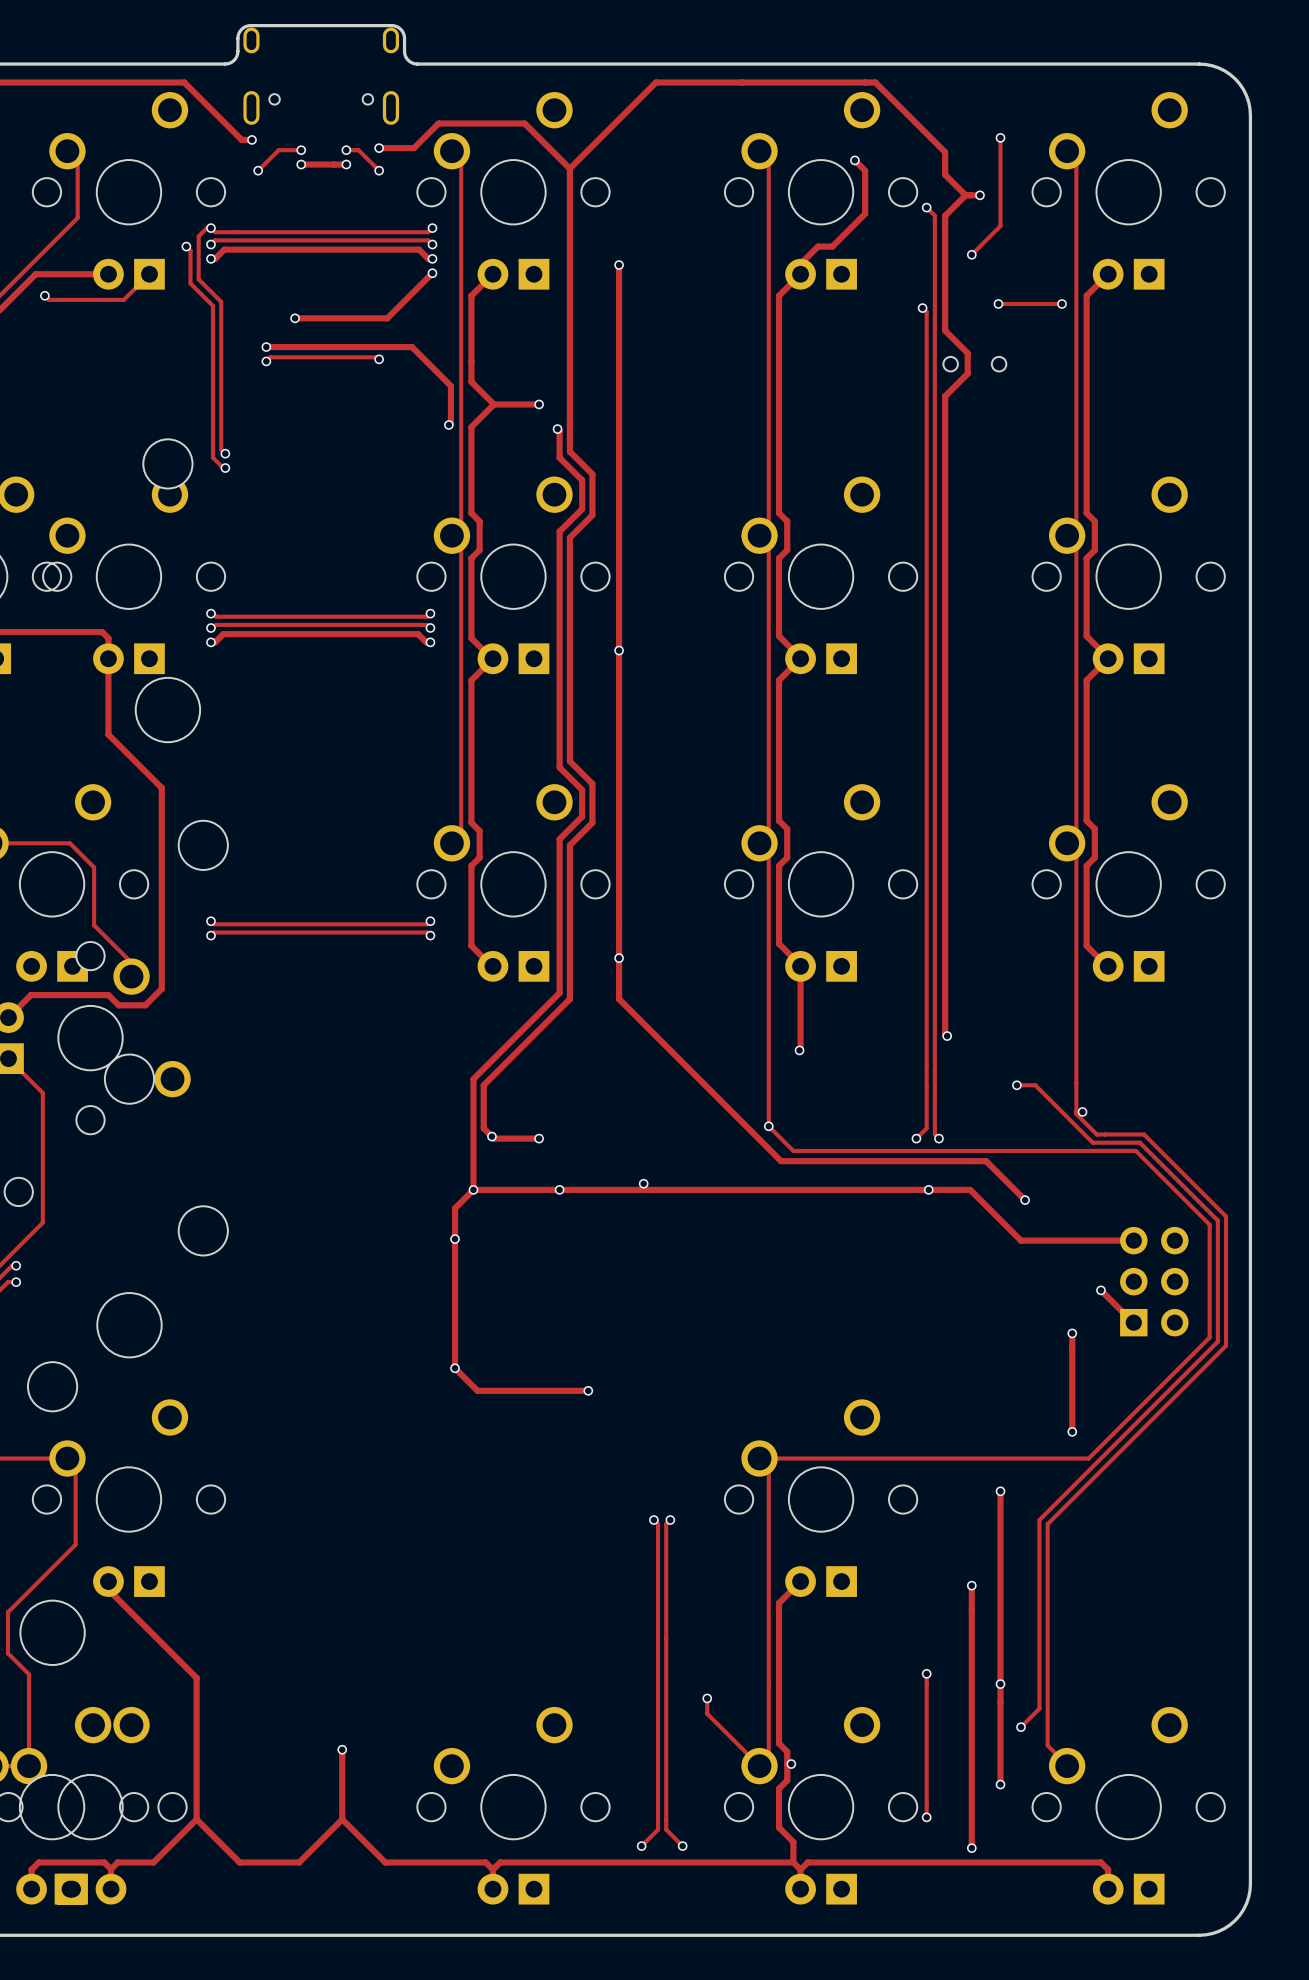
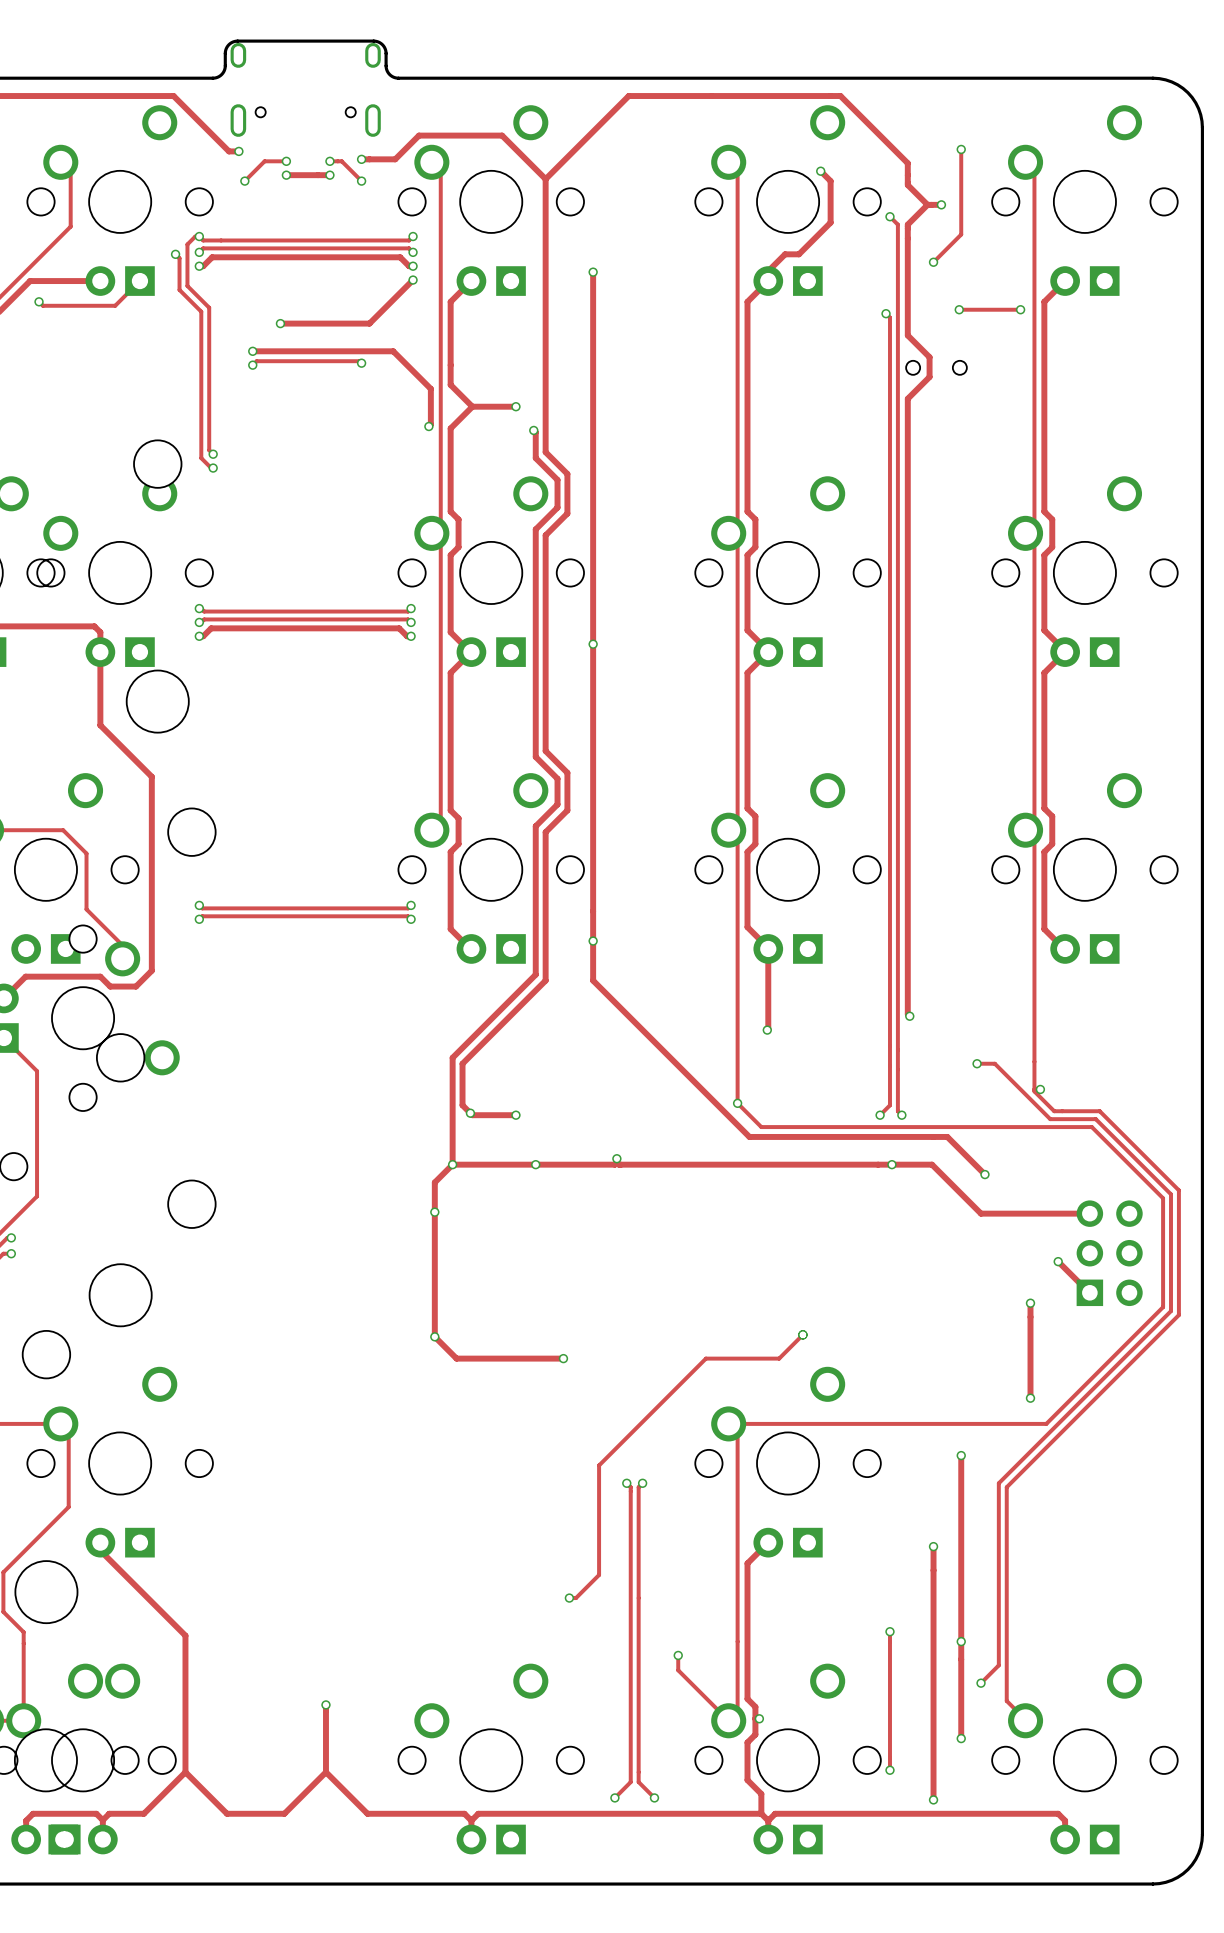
track: none -> (802, 1334) (779, 1358) (705, 1358) (599, 1465) (599, 1574) (576, 1598) (569, 1598)
via: none -> (802, 1334)
via: none -> (569, 1598)

